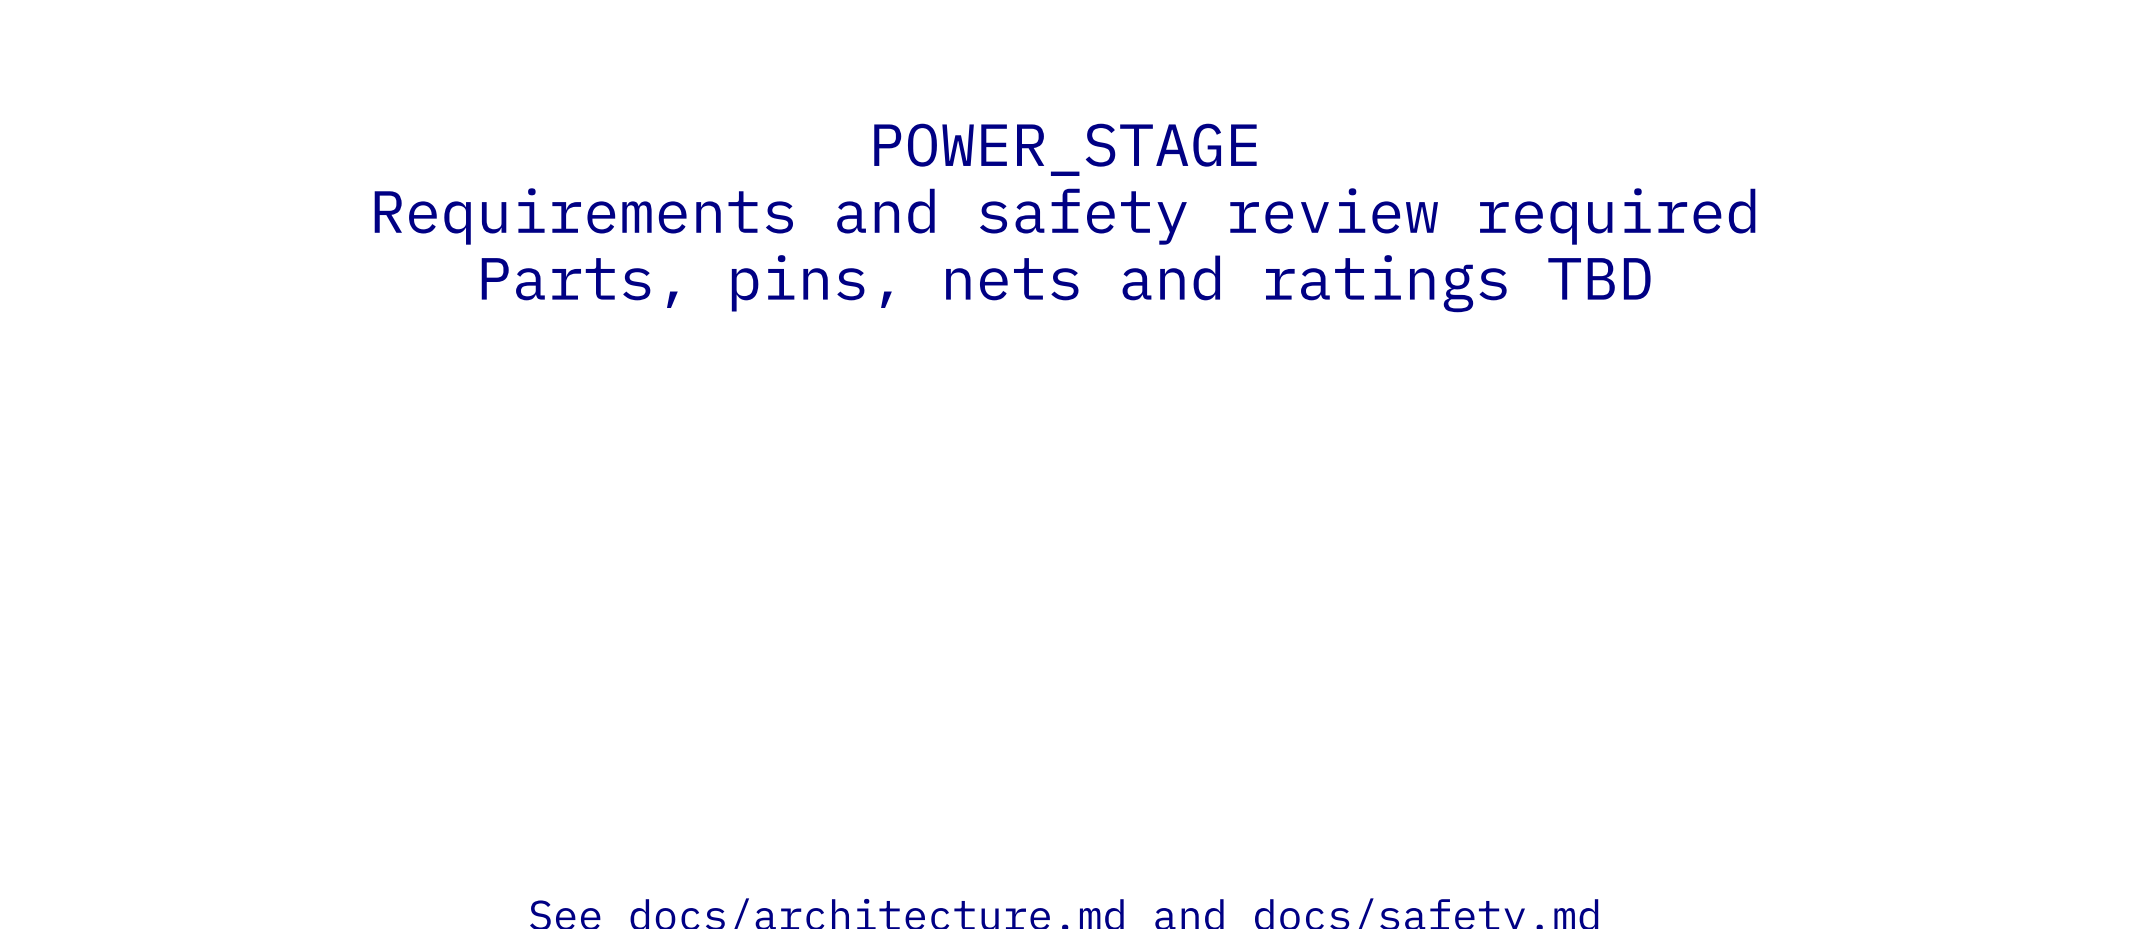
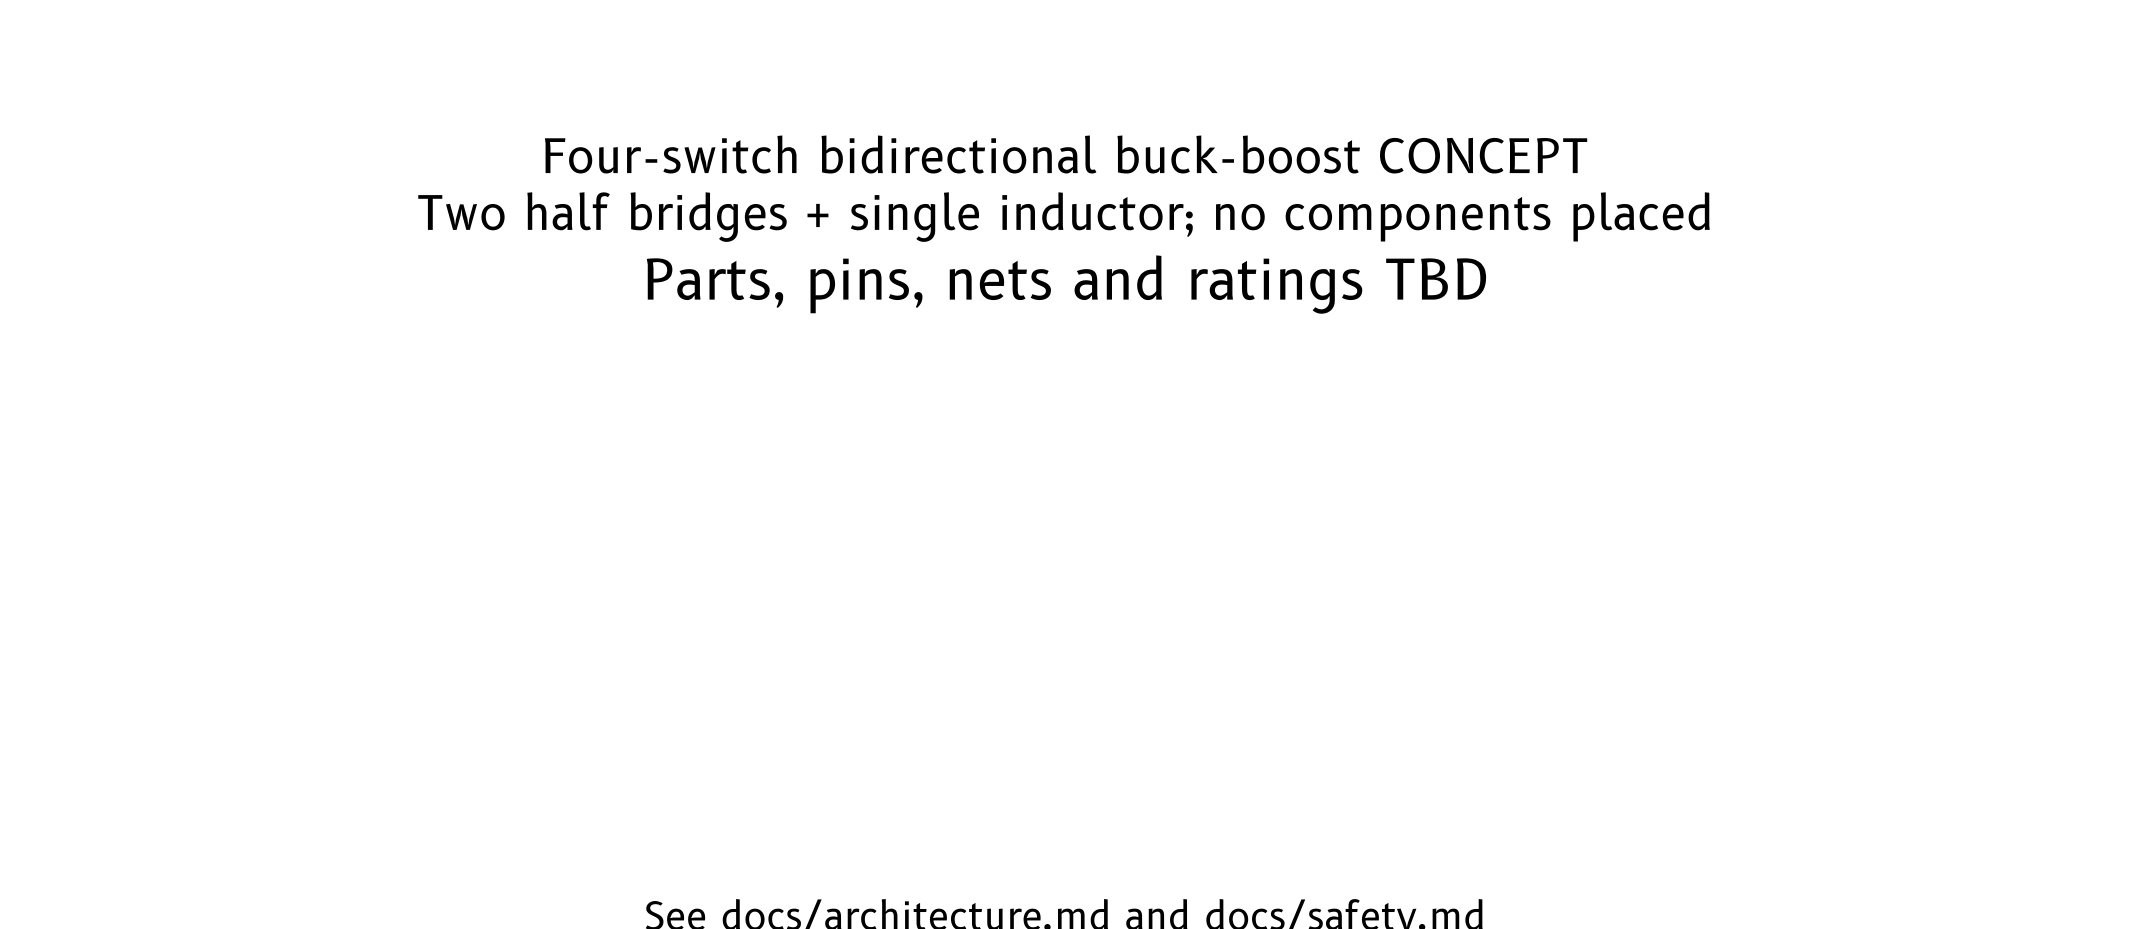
text: POWER_STAGE (1065, 149) -> Four-switch bidirectional buck-boost CONCEPT (1066, 154)
text: Requirements and safety review required (1065, 216) -> Two half bridges + single inductor; no components placed (1064, 217)

